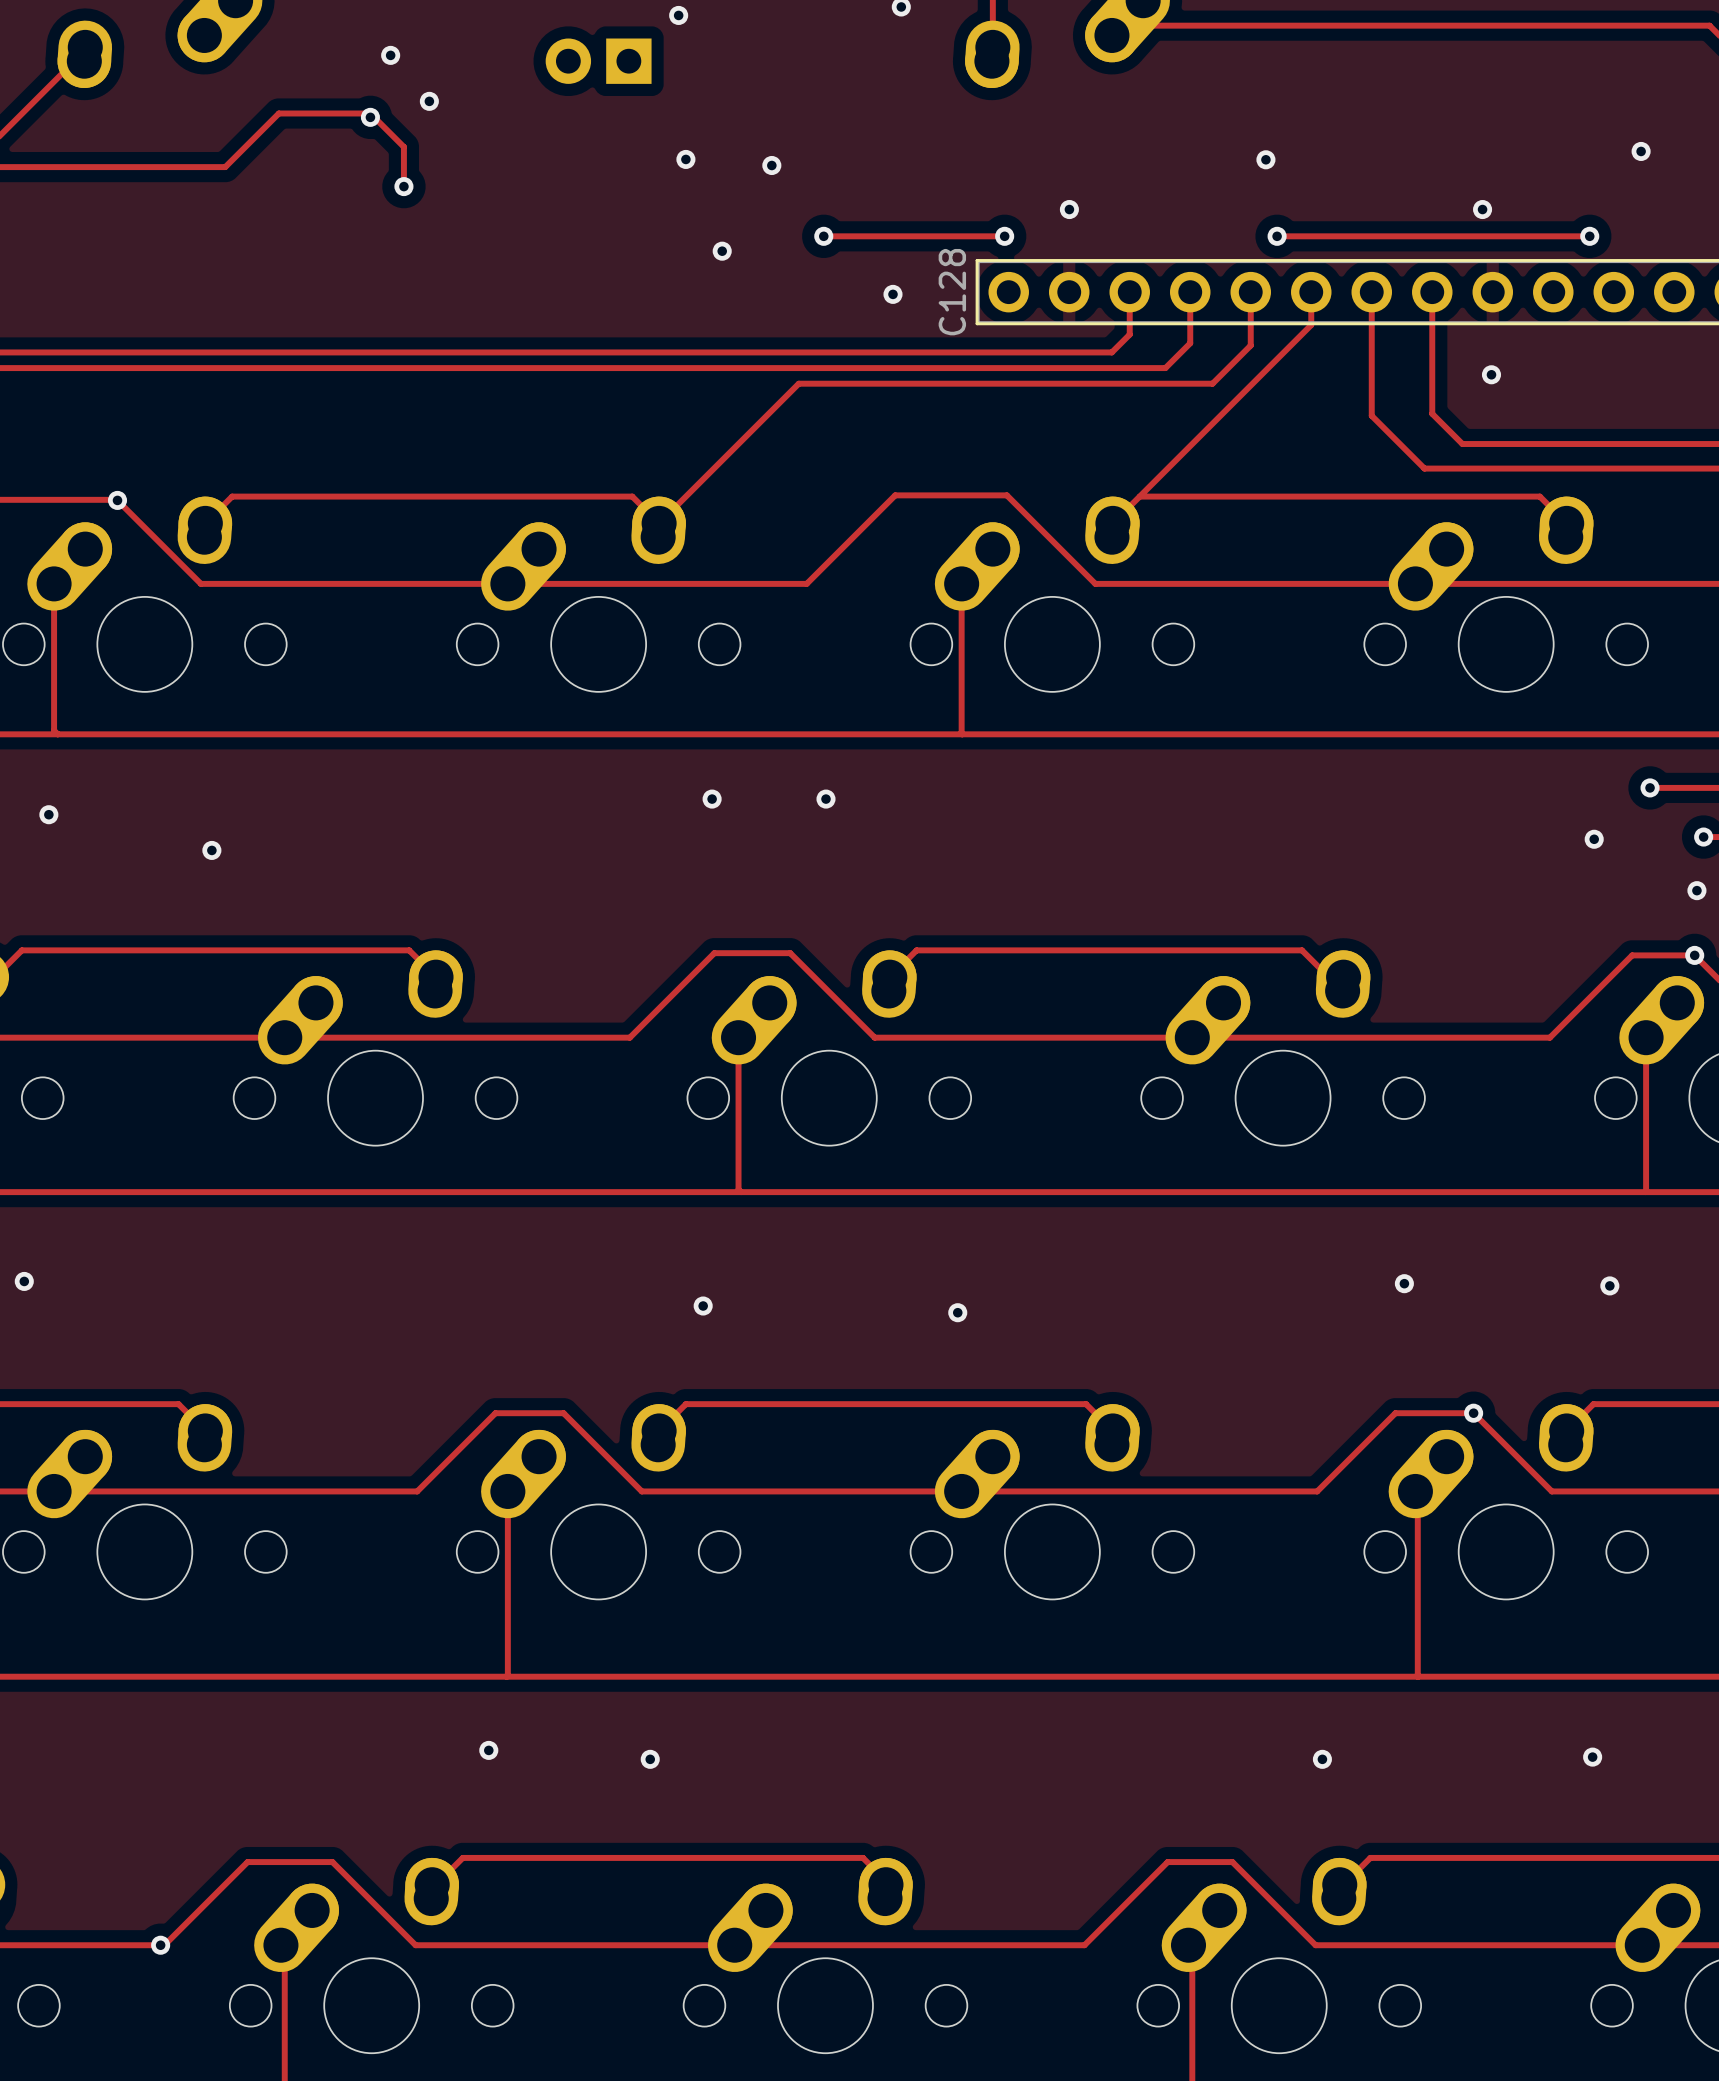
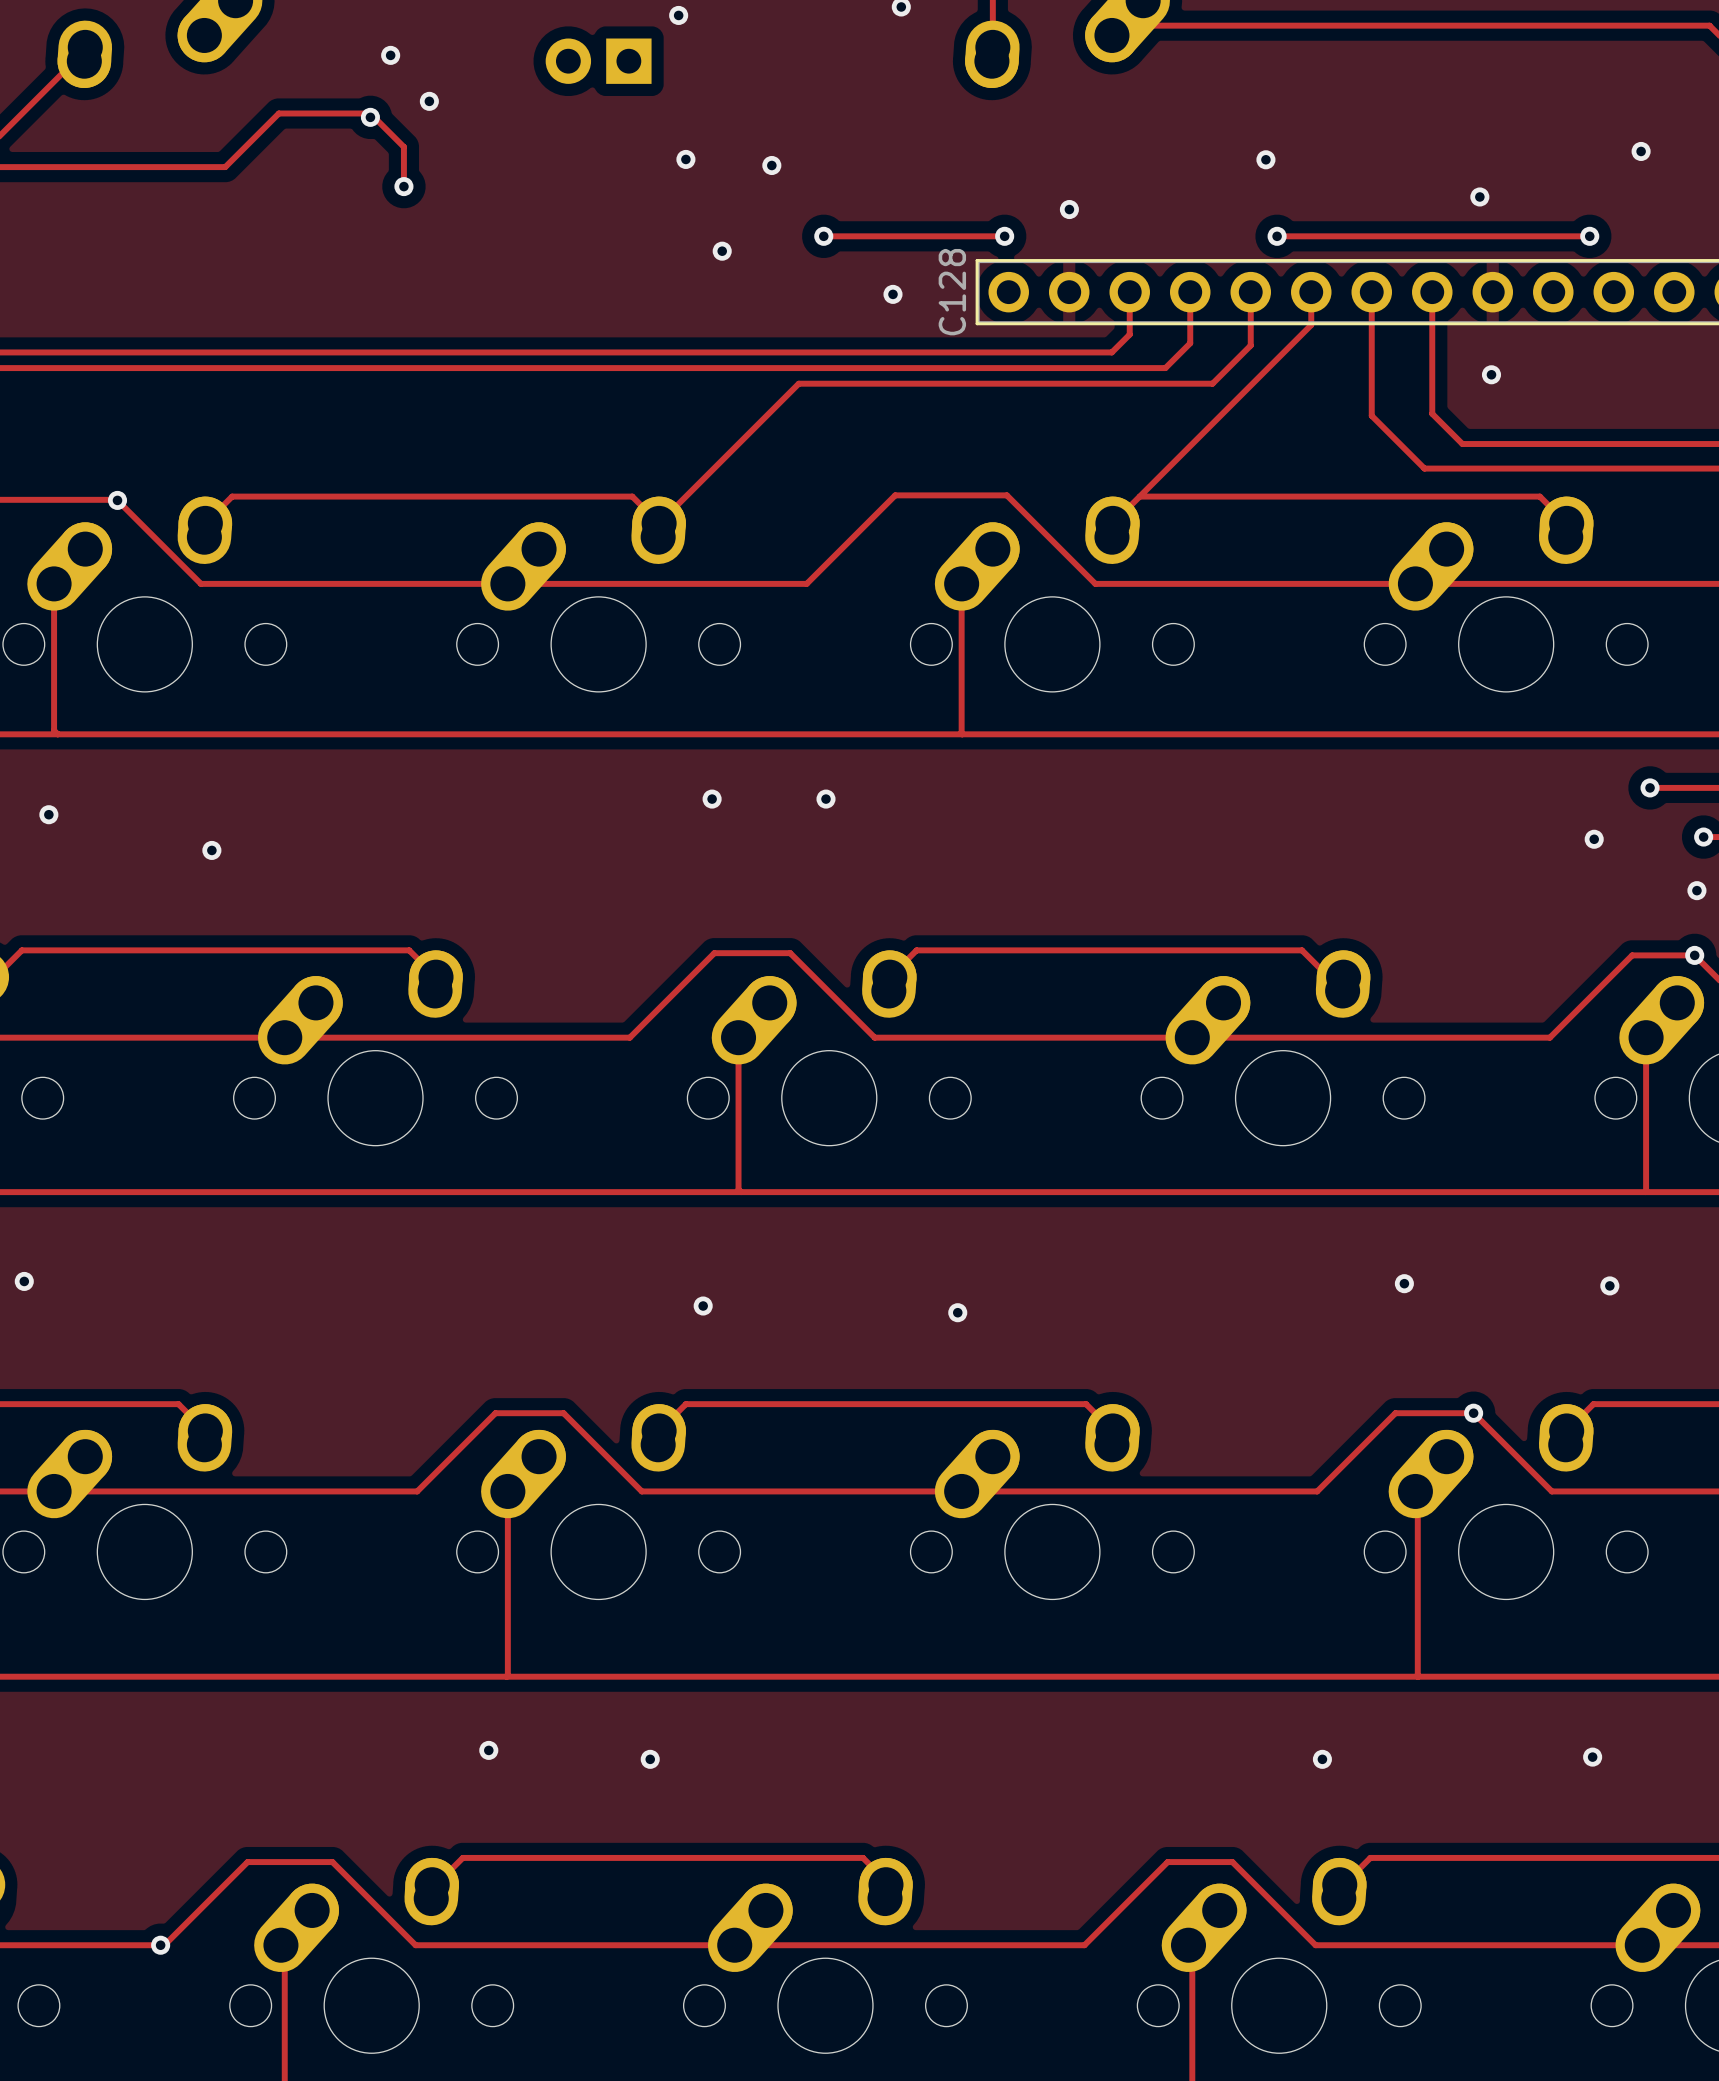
via position: (1482, 209) -> (1479, 196)

